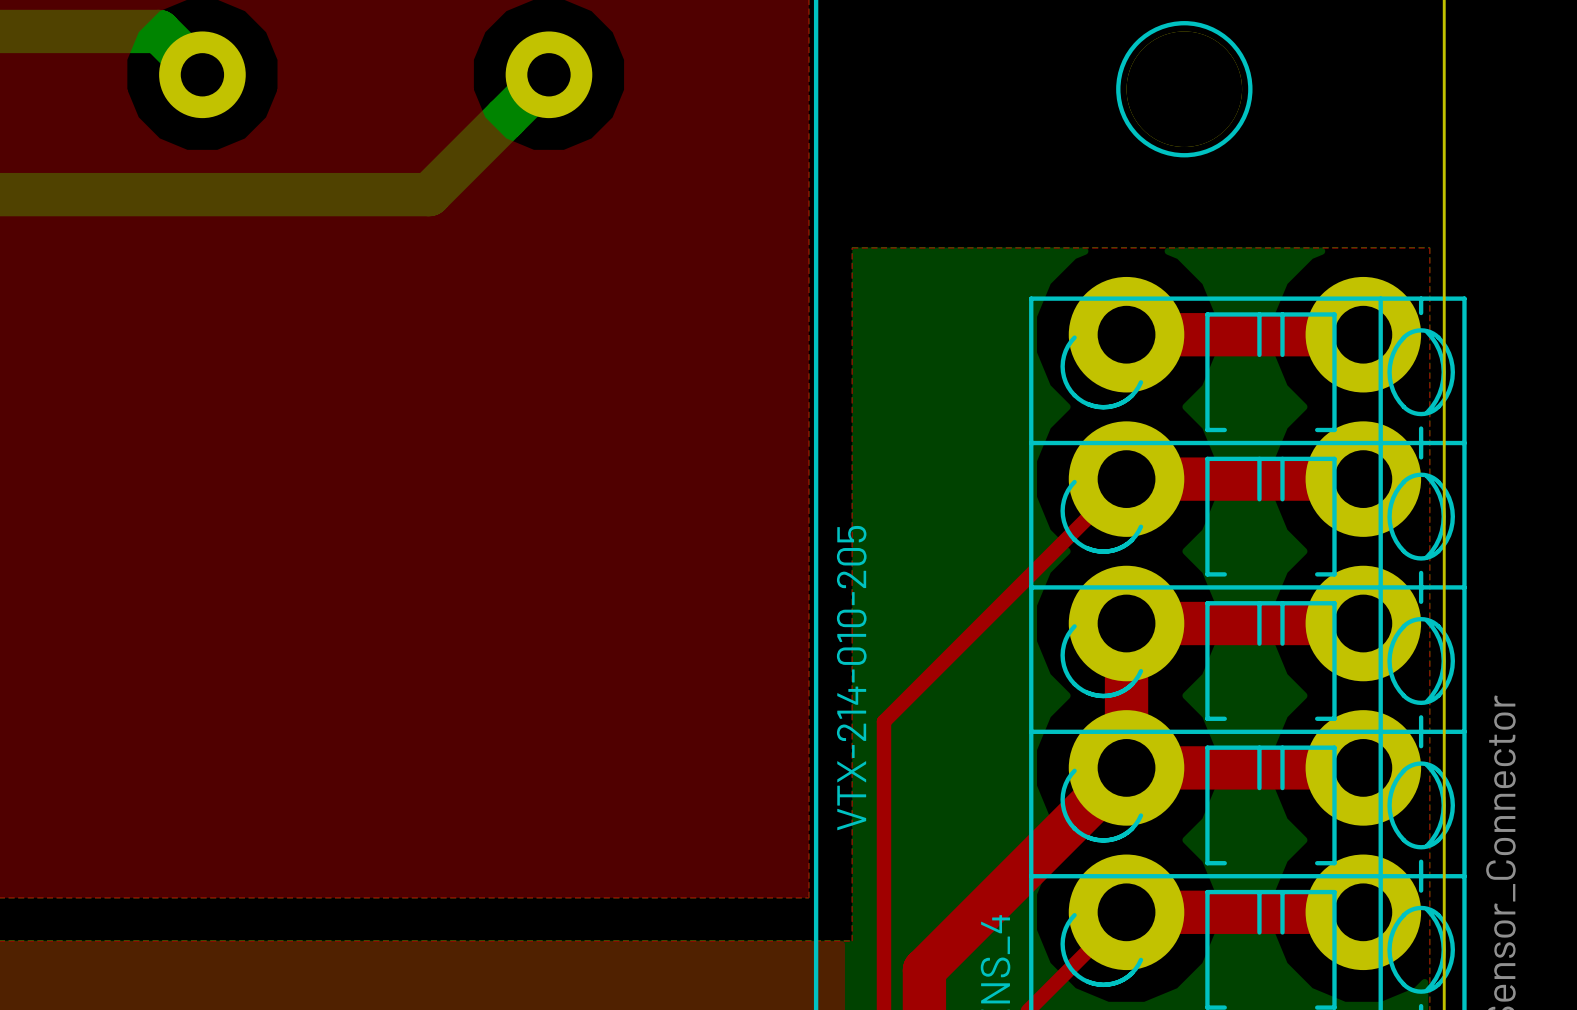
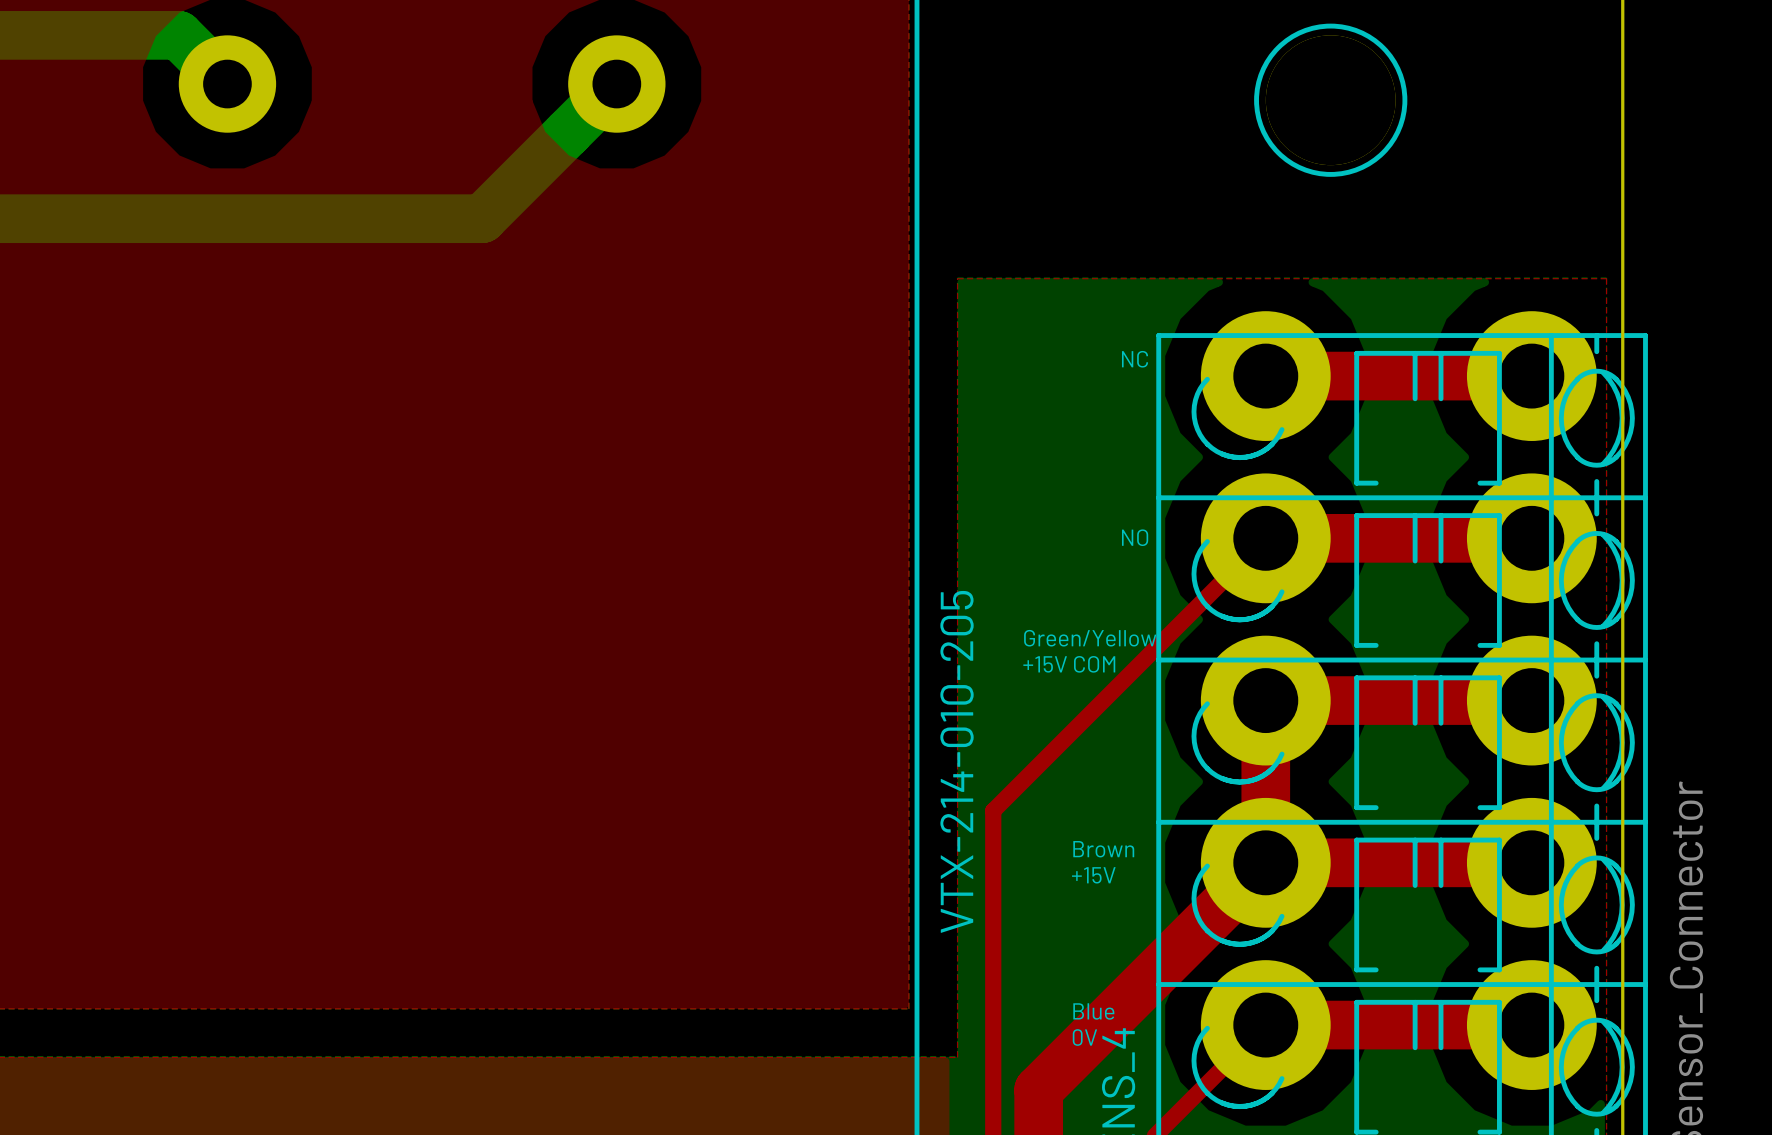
text: none -> NC (1135, 359)
text: none -> NO (1135, 537)
text: none -> Green/Yellow (1090, 638)
text: none -> +15V COM (1069, 664)
text: none -> Brown (1103, 849)
text: none -> +15V (1093, 875)
text: none -> Blue (1093, 1011)
text: none -> 0V (1084, 1037)

